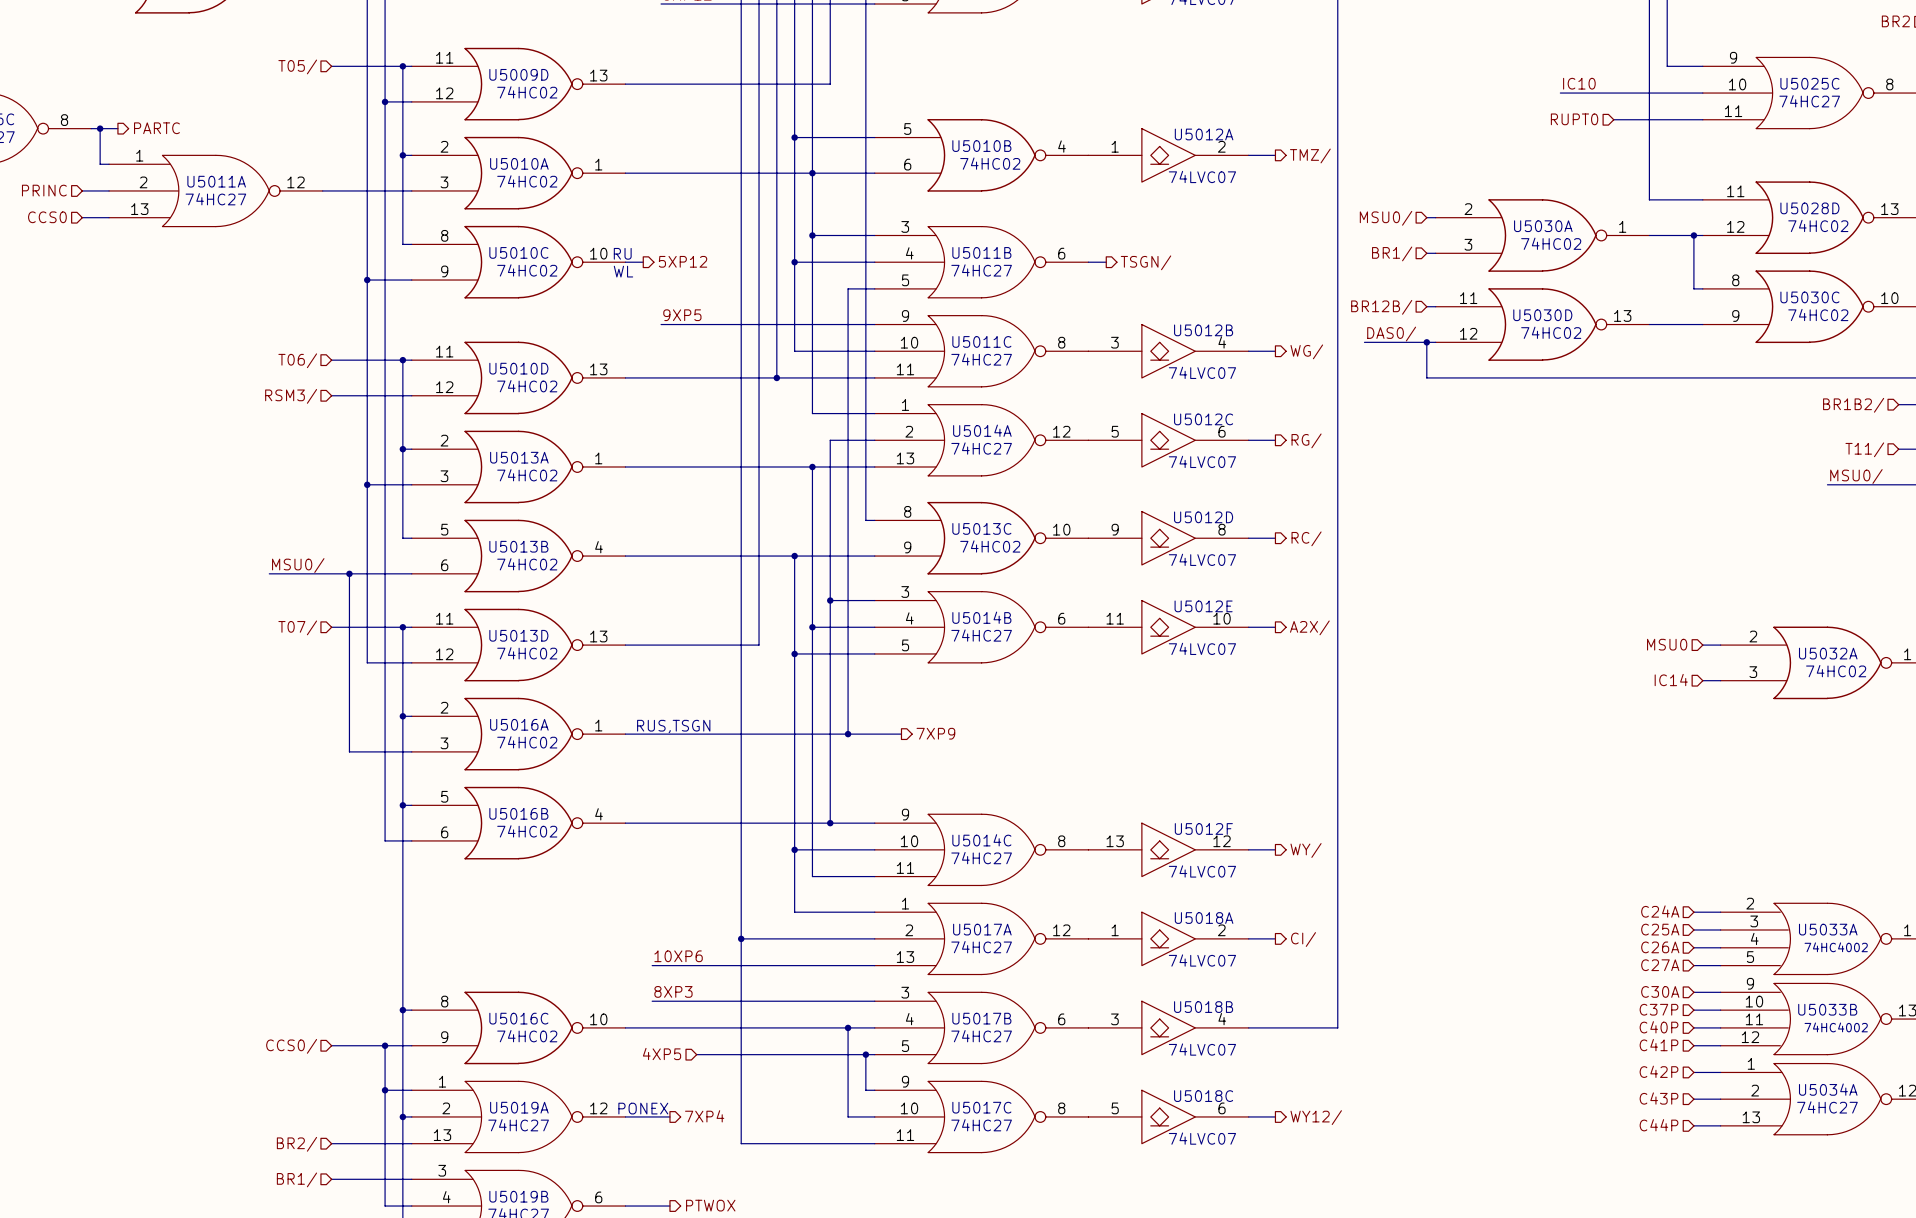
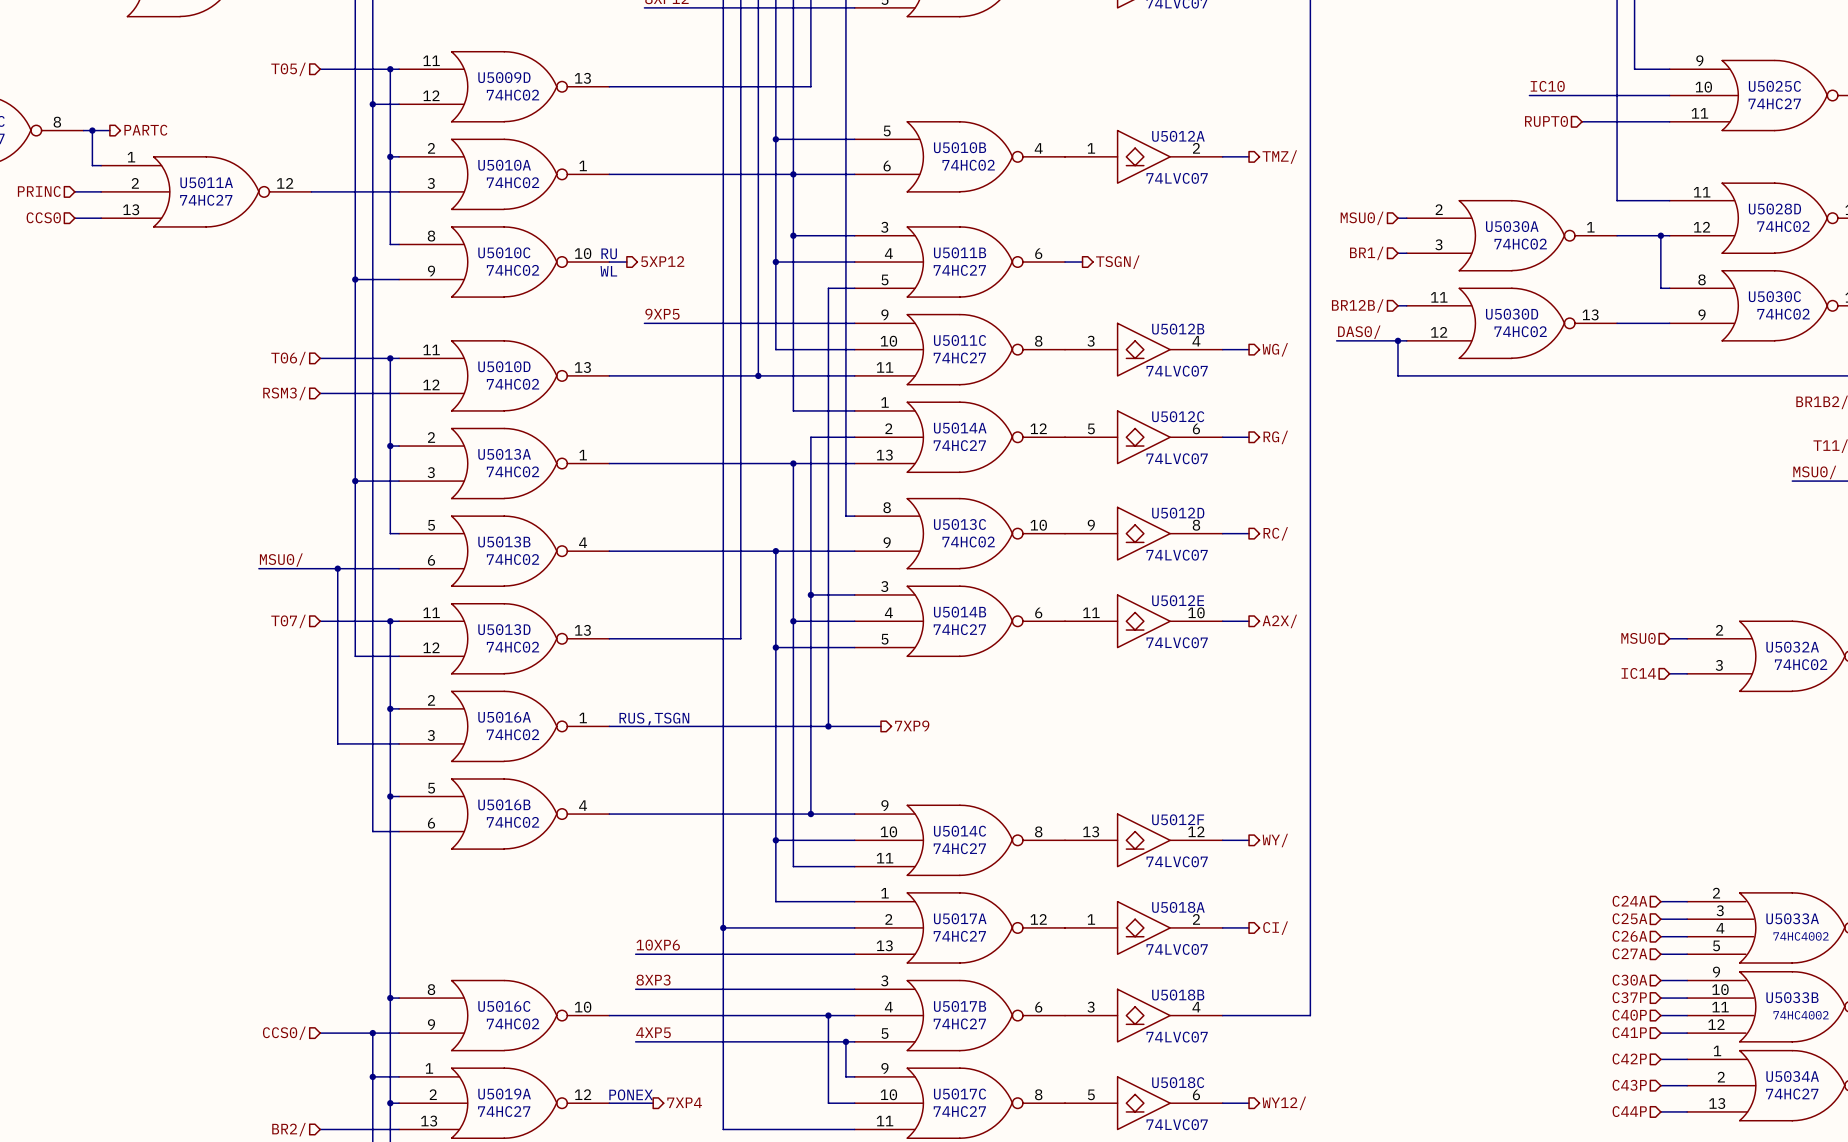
label: none -> 4XP5 (653, 1032)
hierarchical label: 4XP5 (662, 1053) -> none
wire: none -> (635, 1041) (679, 1041)

